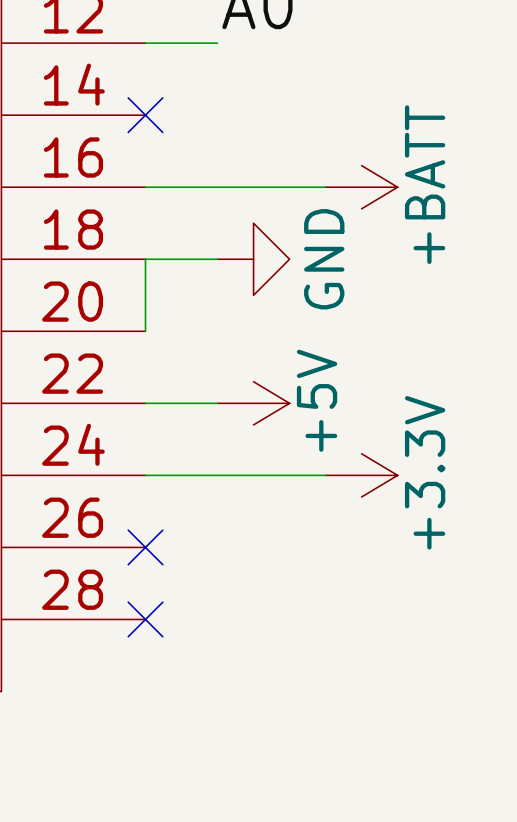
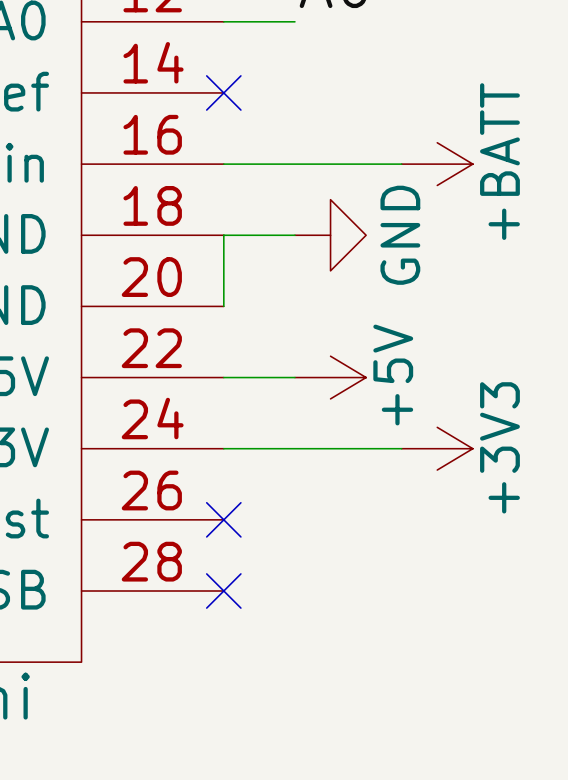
power symbol: +3.3V (361, 475) -> +3V3 (437, 448)

